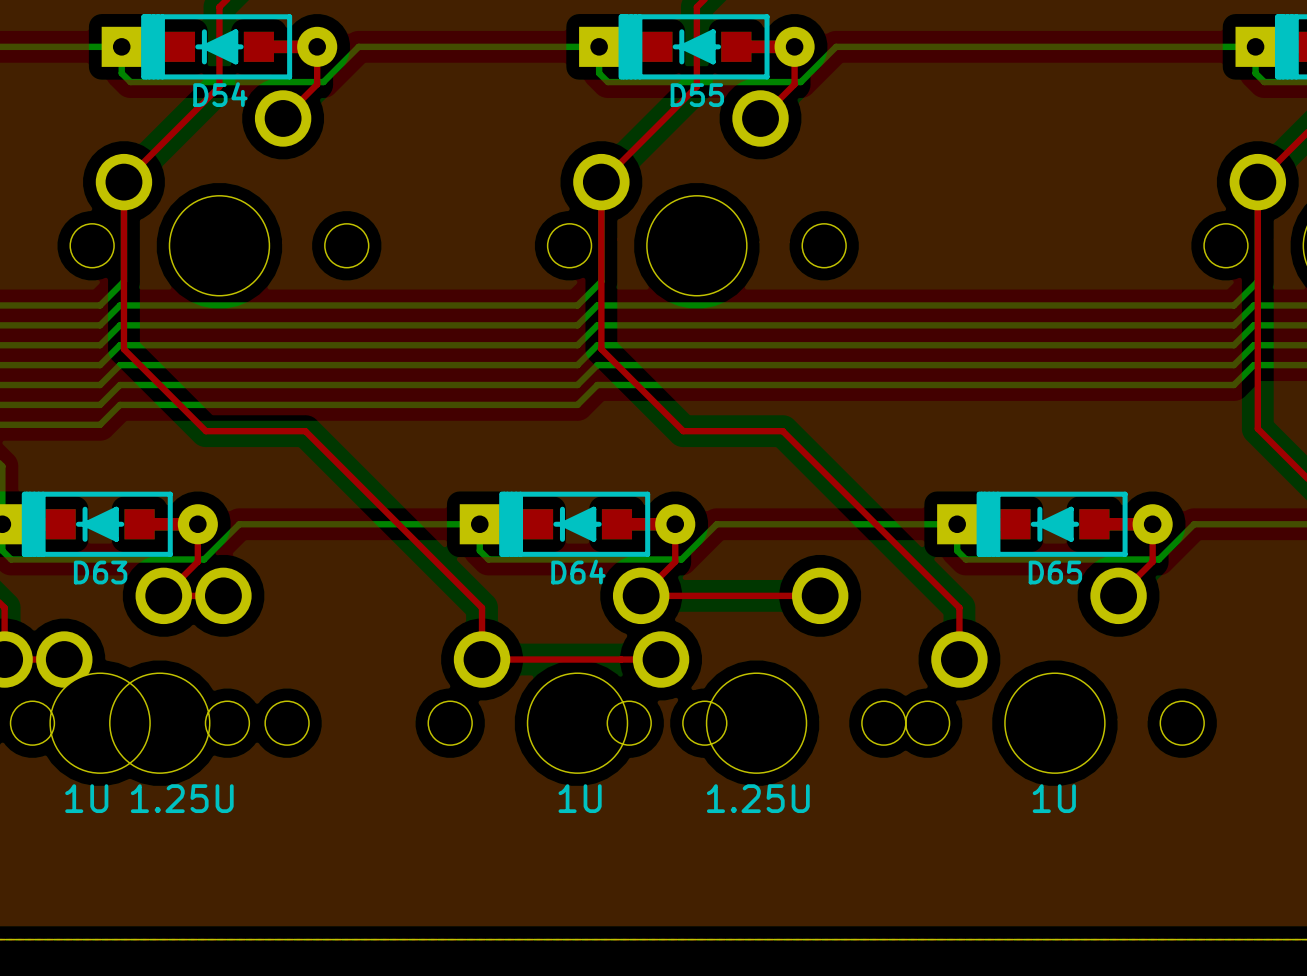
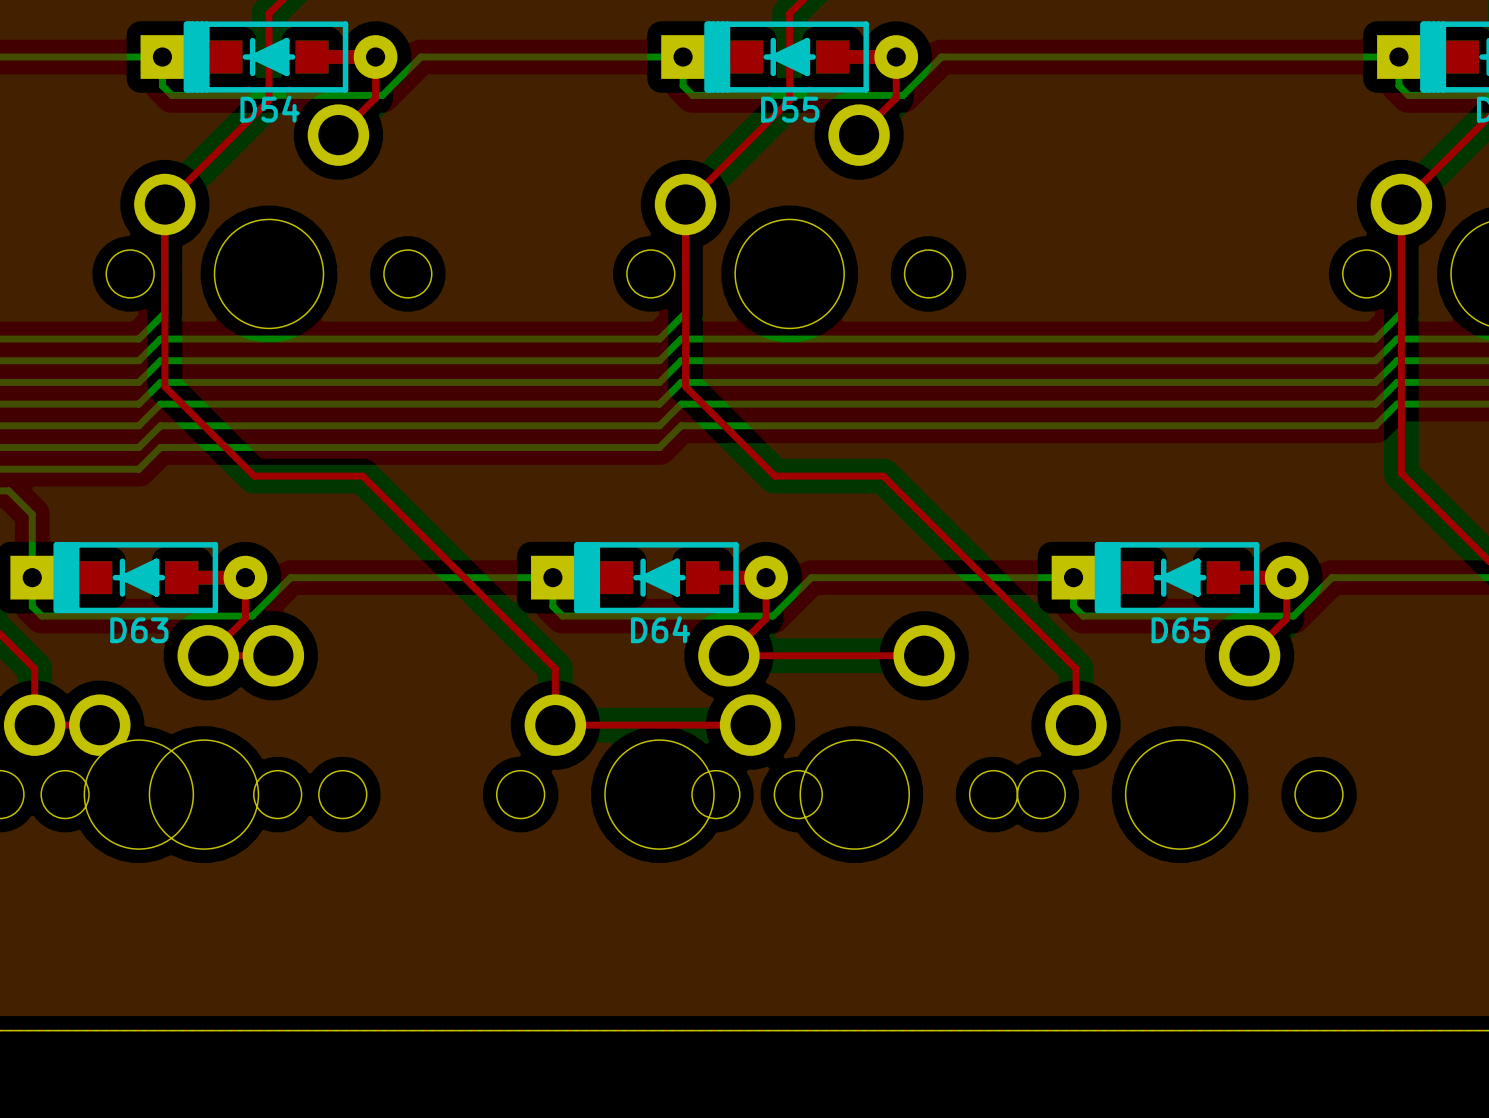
text: 1U (86, 798) -> none
text: 1.25U (182, 798) -> none
text: 1U (580, 798) -> none
text: 1.25U (758, 798) -> none
text: 1U (1054, 798) -> none

